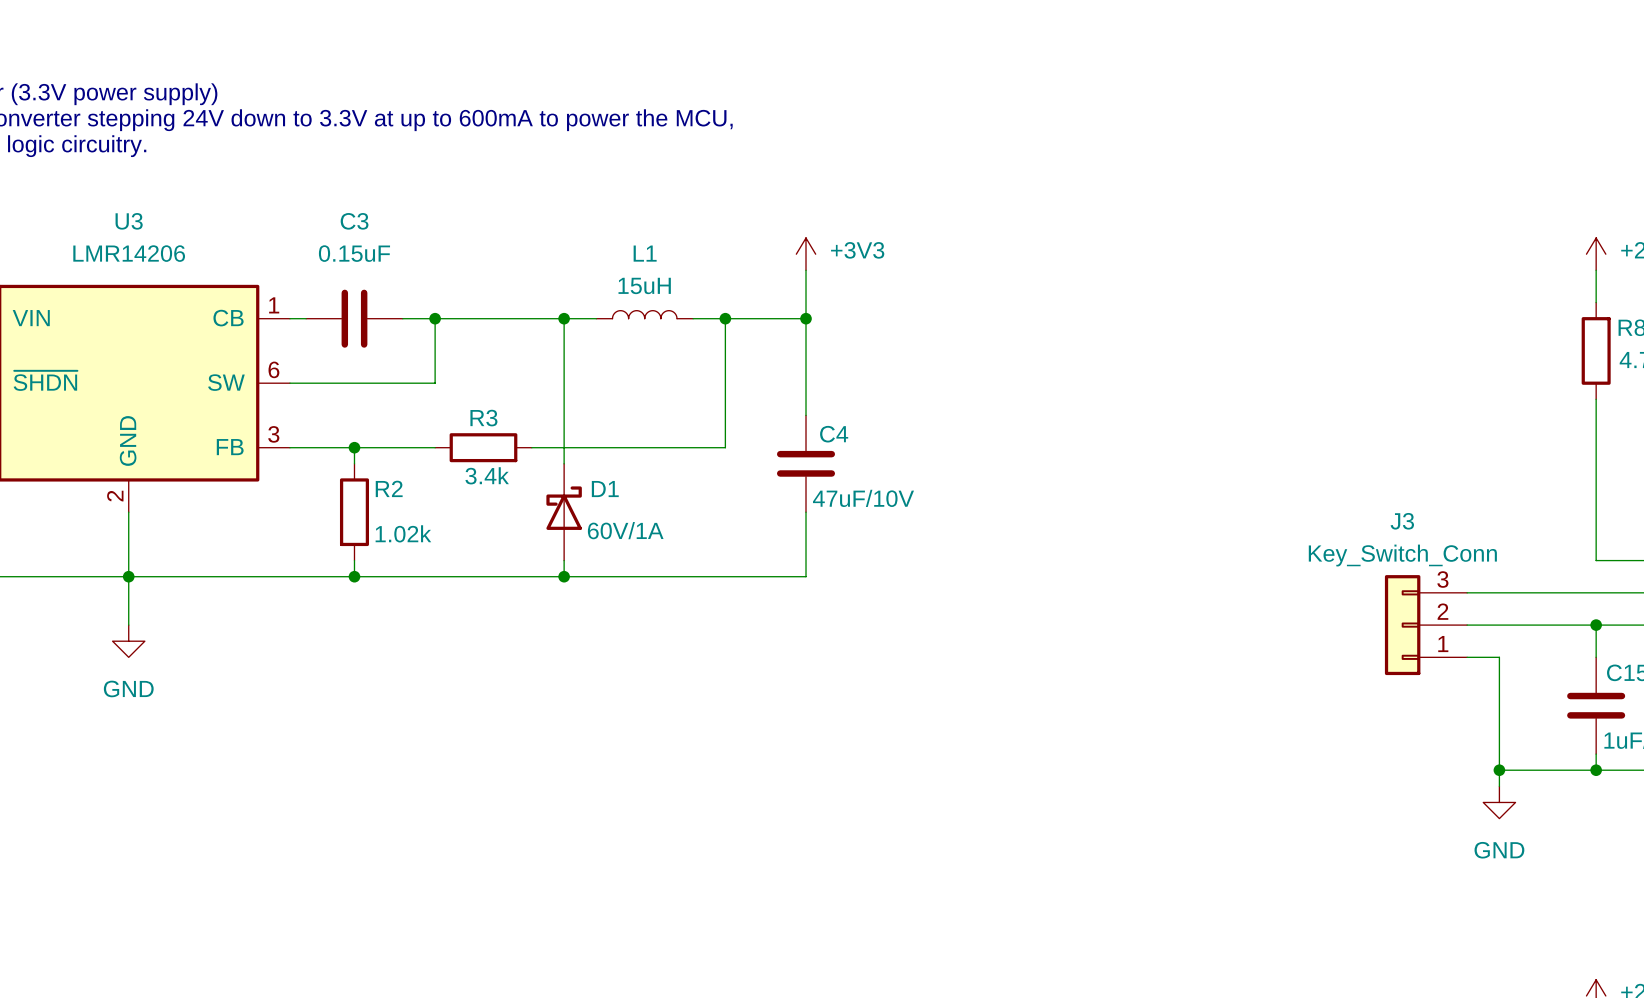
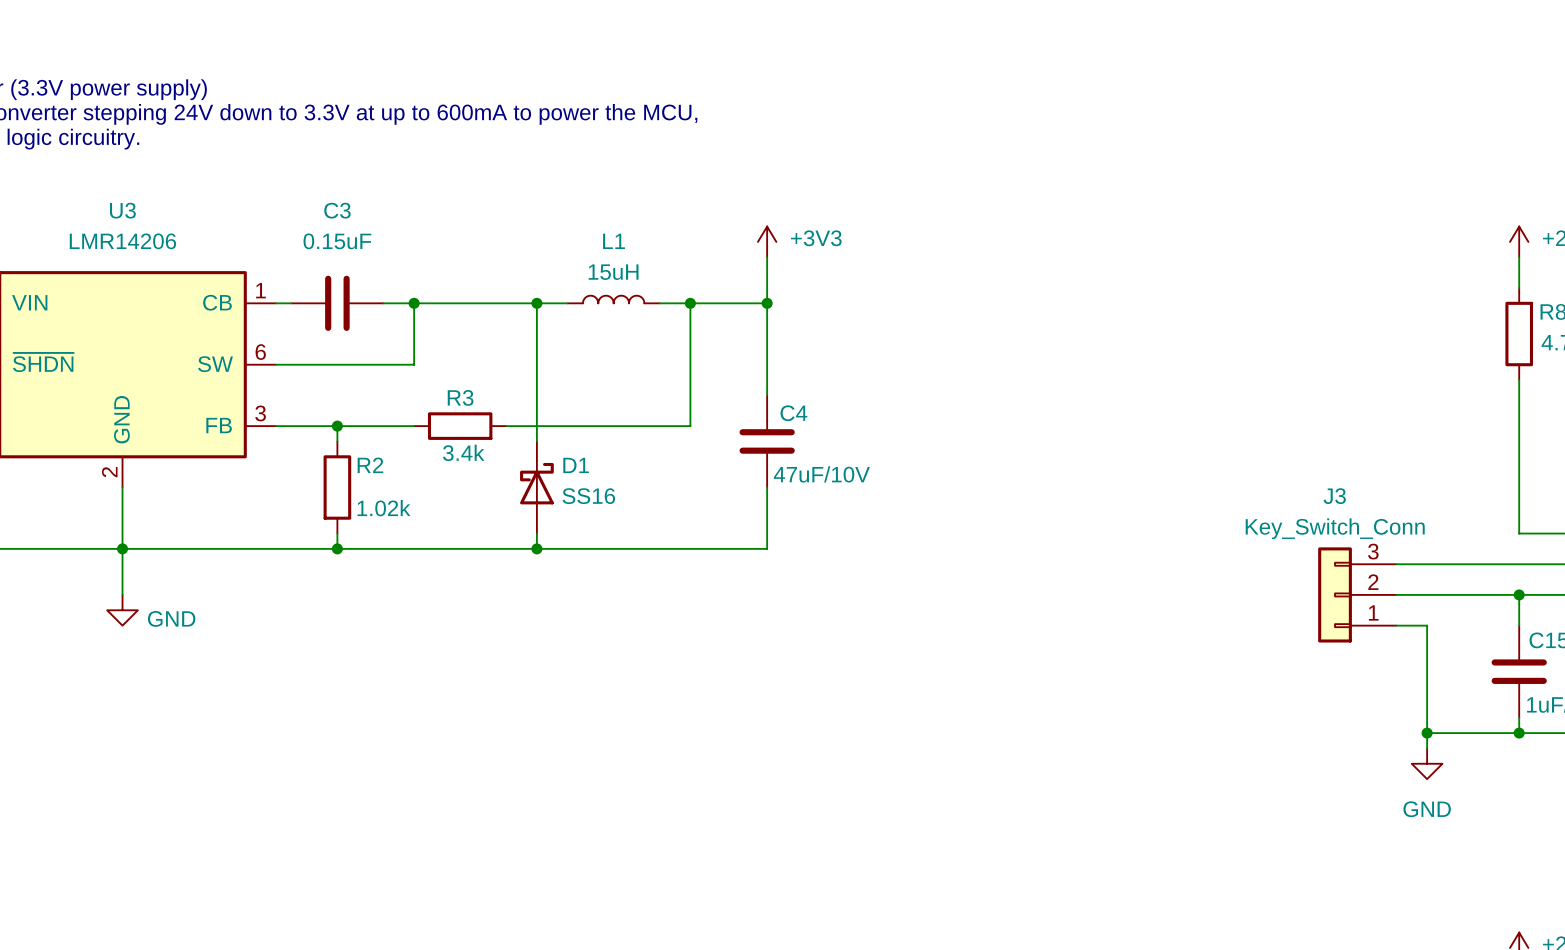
D1 value: 60V/1A (625, 530) -> SS16 (588, 496)
power symbol text position: GND (128, 688) -> GND (171, 618)

